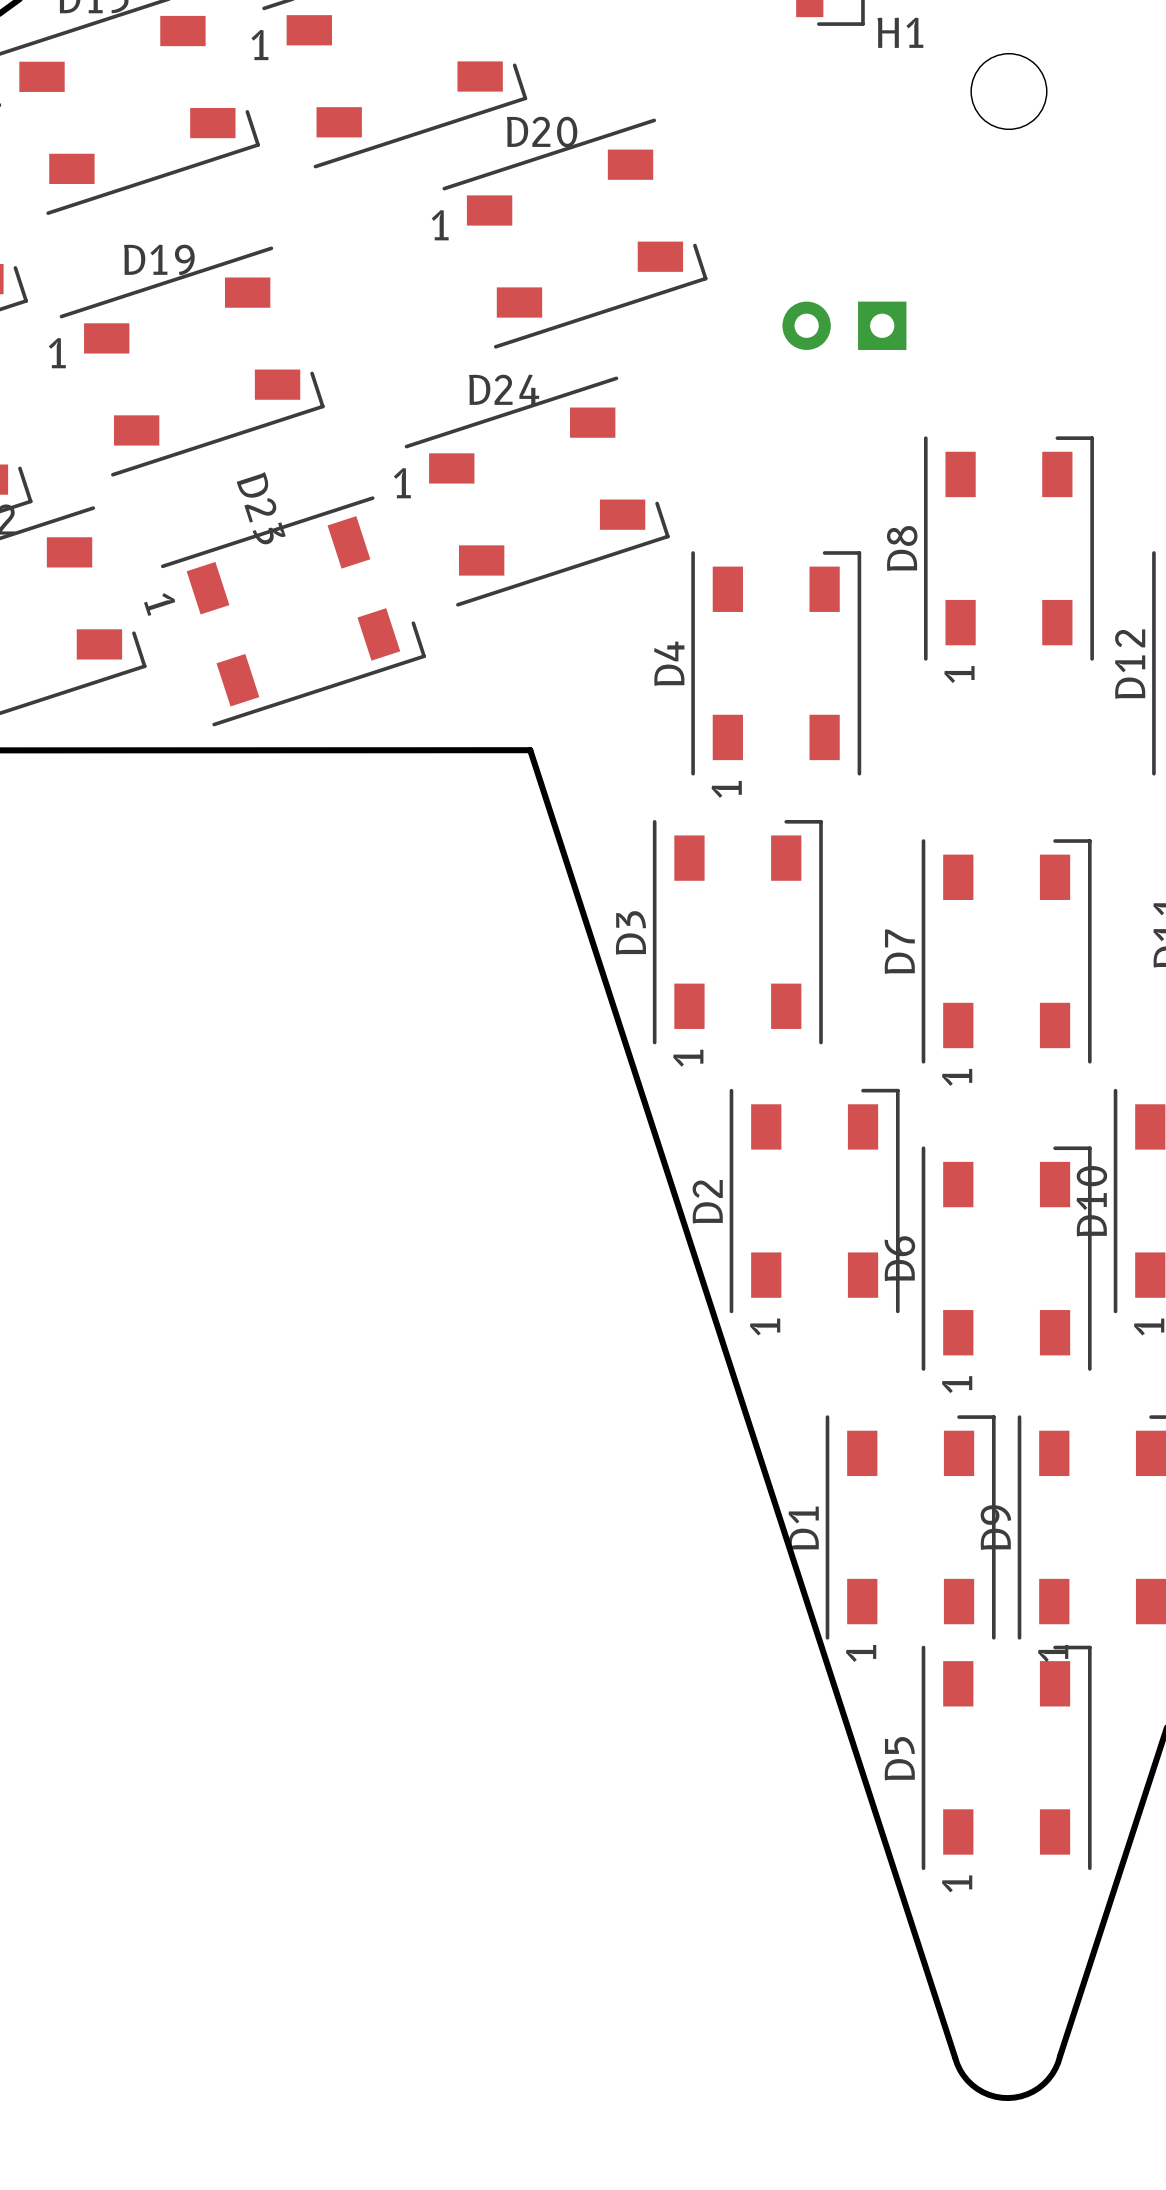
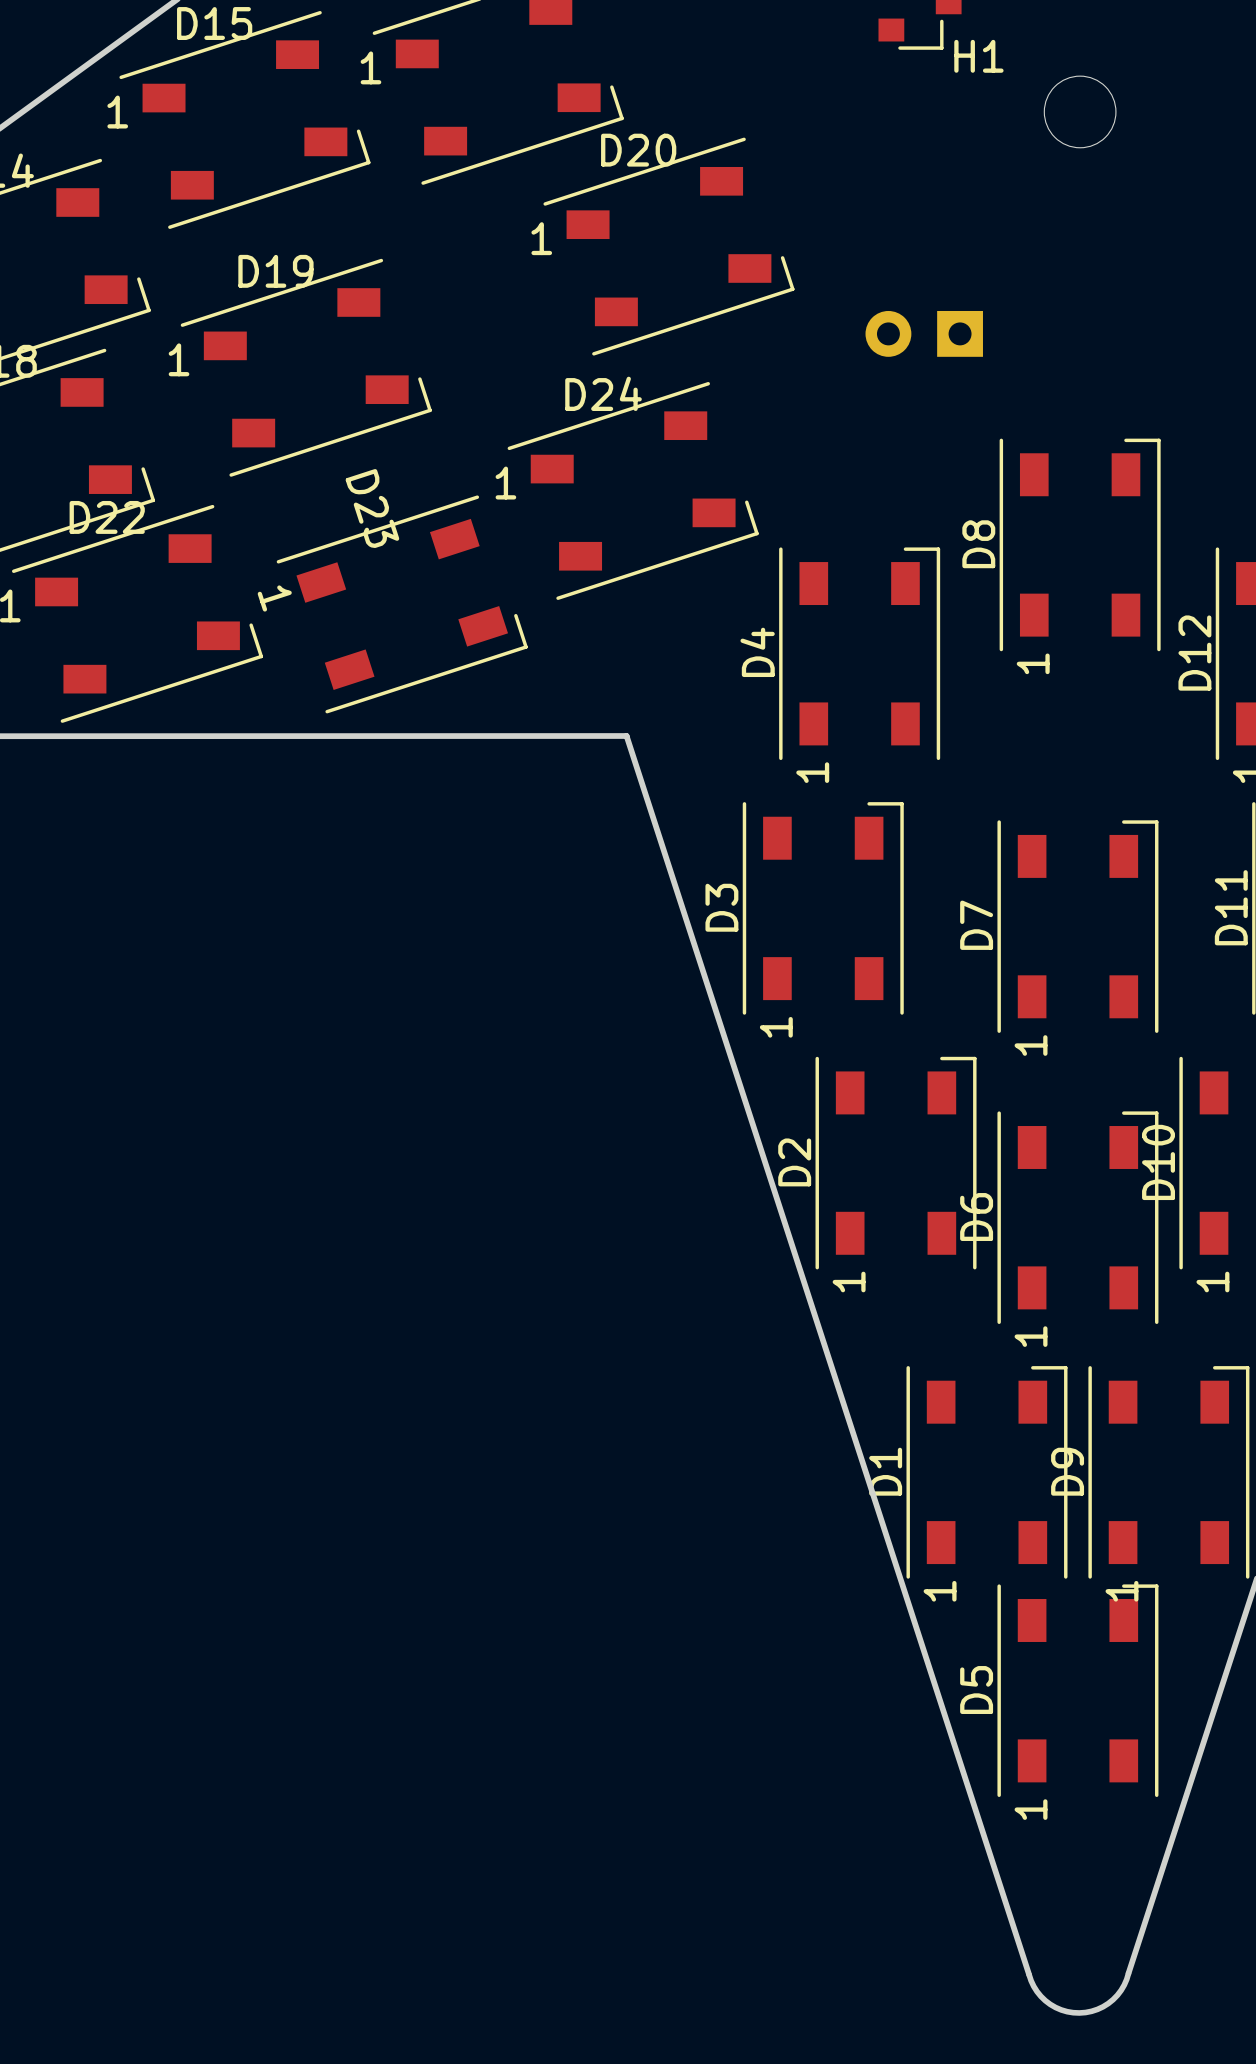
D23 footprint: [160, 496, 426, 727] -> [276, 495, 528, 714]

